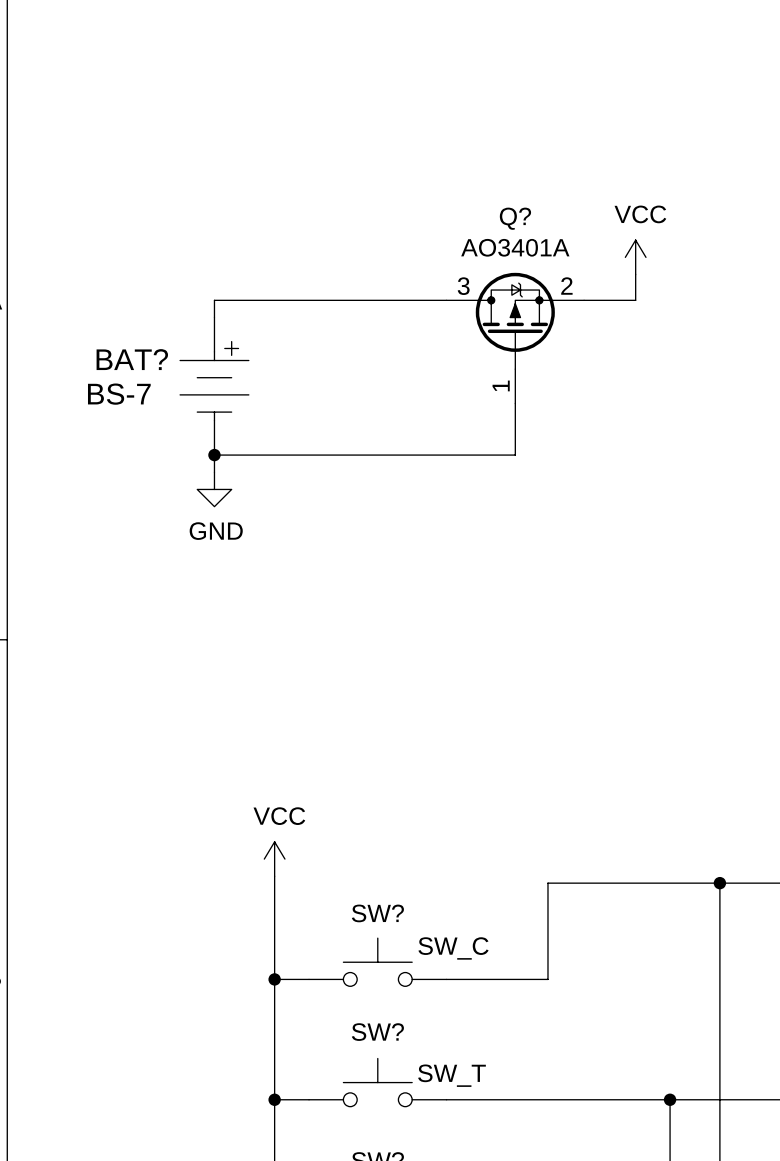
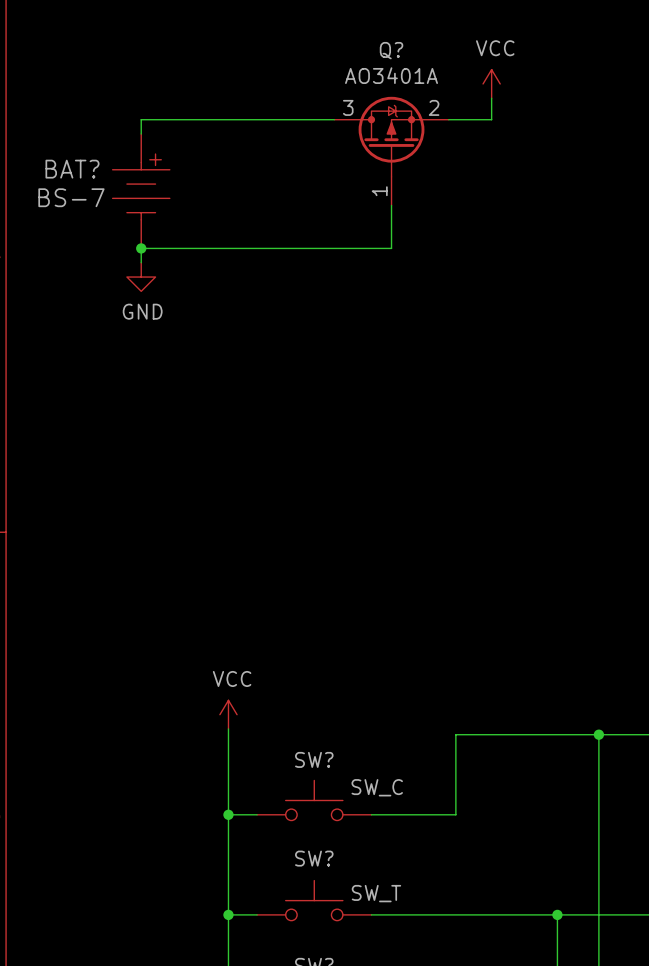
power symbol position: VCC (635, 257) -> VCC (491, 83)
wire: (635, 274) (635, 300) (584, 300) -> (491, 98) (491, 119) (448, 119)
junction: none -> (141, 248)
wire: (446, 300) (214, 300) (214, 317) -> (334, 119) (141, 119) (141, 134)
Q? position: (515, 338) -> (391, 151)
BAT? position: (214, 386) -> (141, 191)
wire: (515, 403) (515, 455) (214, 455) (214, 472) -> (391, 205) (391, 248) (141, 248) (141, 262)
junction: (214, 455) -> none
power symbol position: GND (214, 489) -> GND (141, 277)

